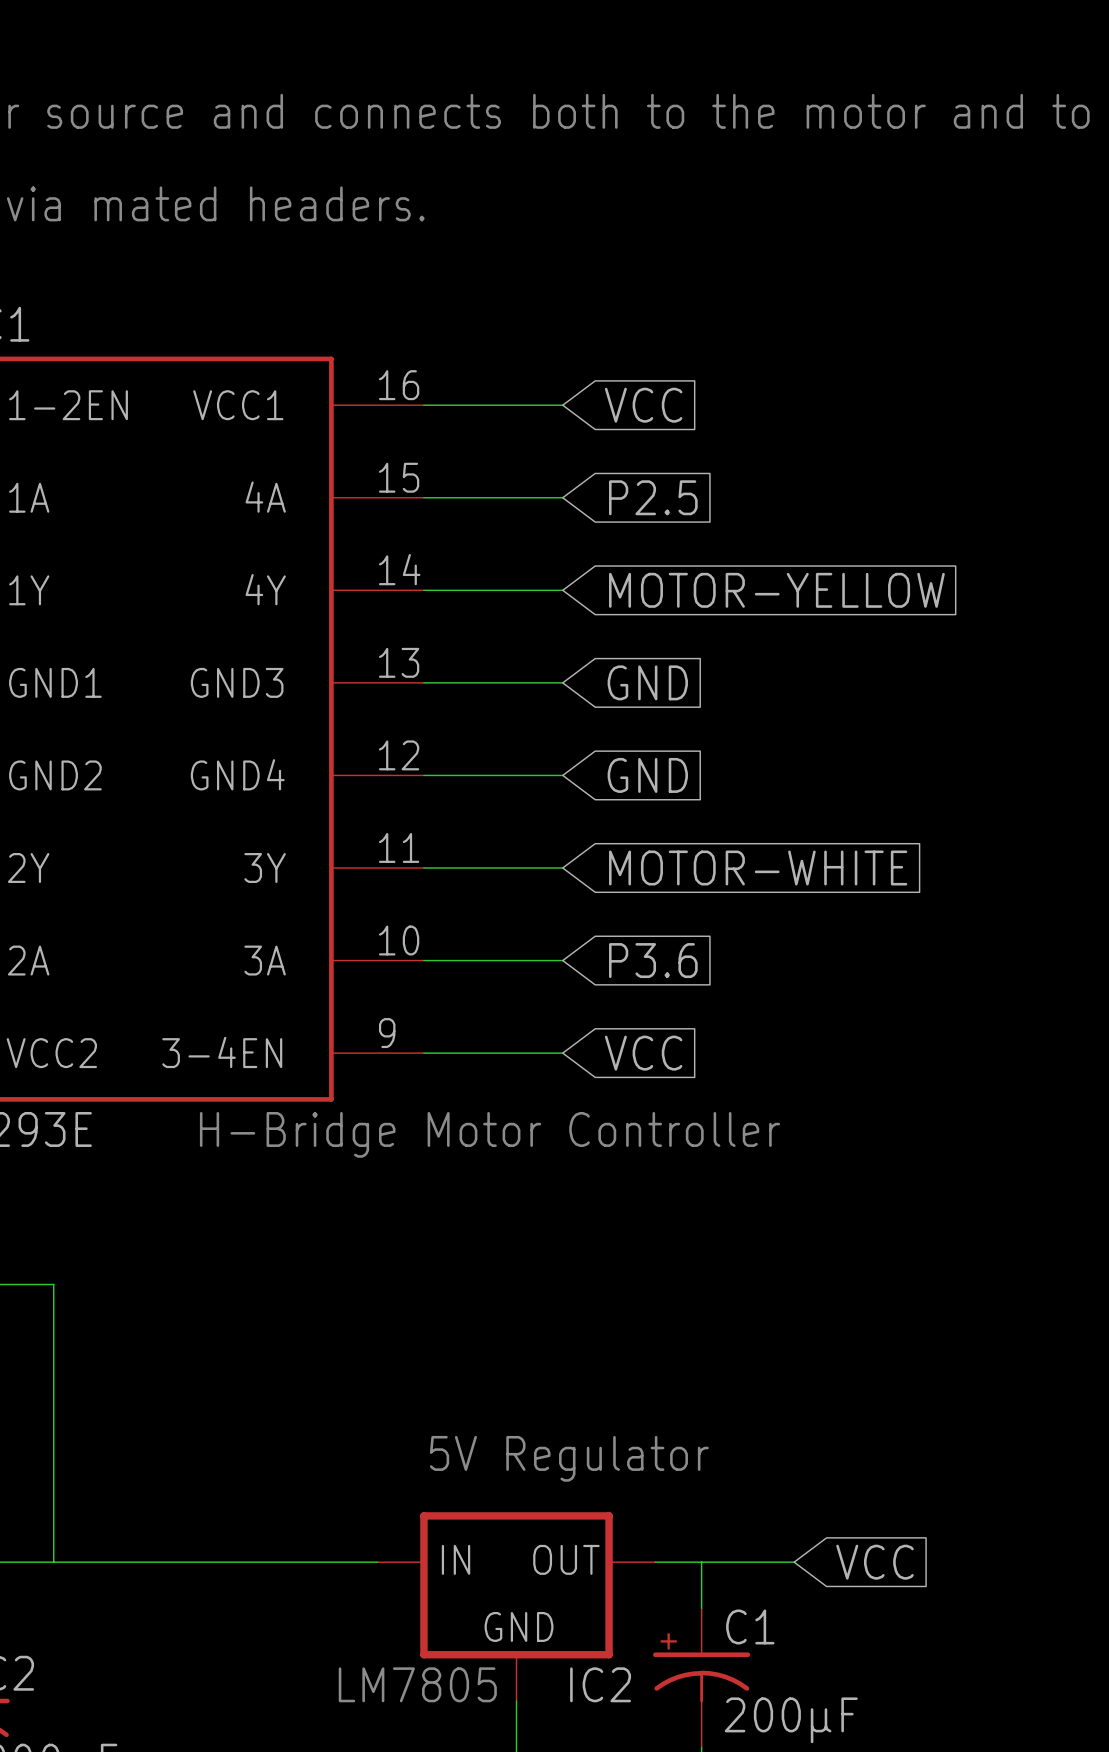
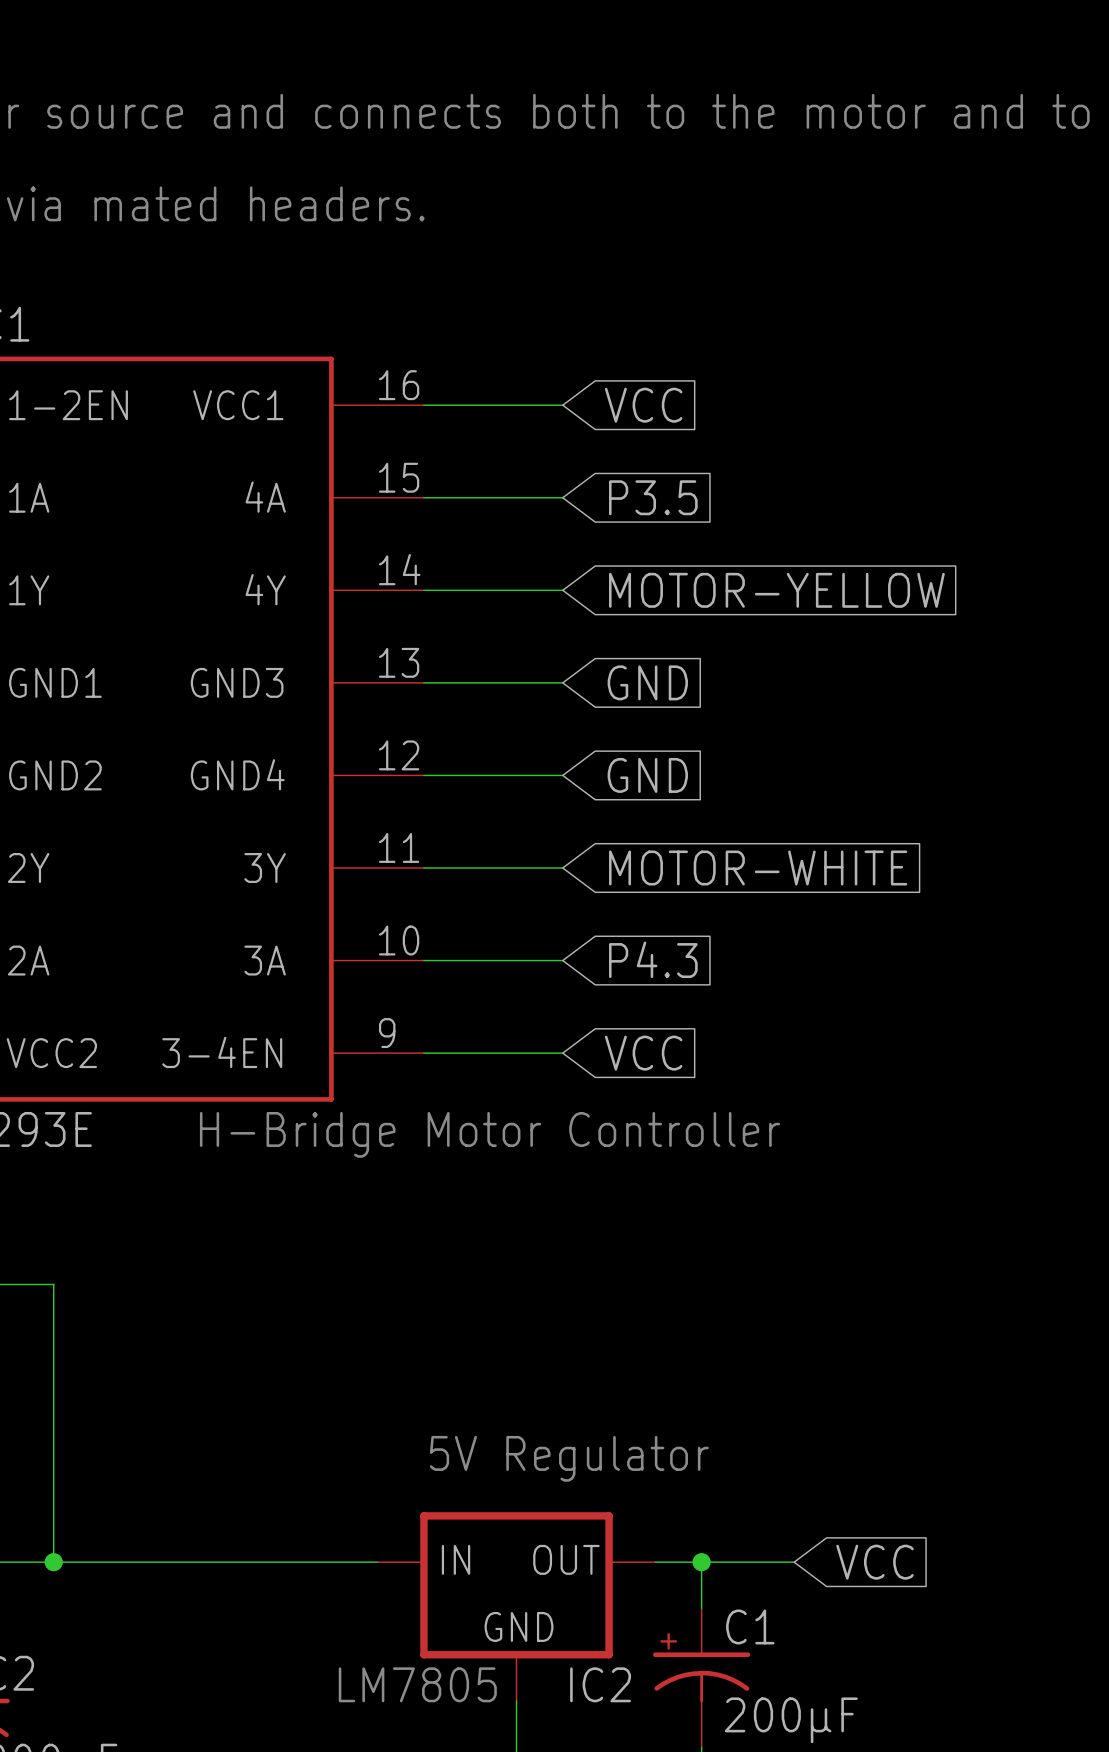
global label: P2.5 (653, 497) -> P3.5 (653, 497)
global label: P3.6 (653, 960) -> P4.3 (653, 959)
junction: none -> (53, 1562)
junction: none -> (701, 1562)

